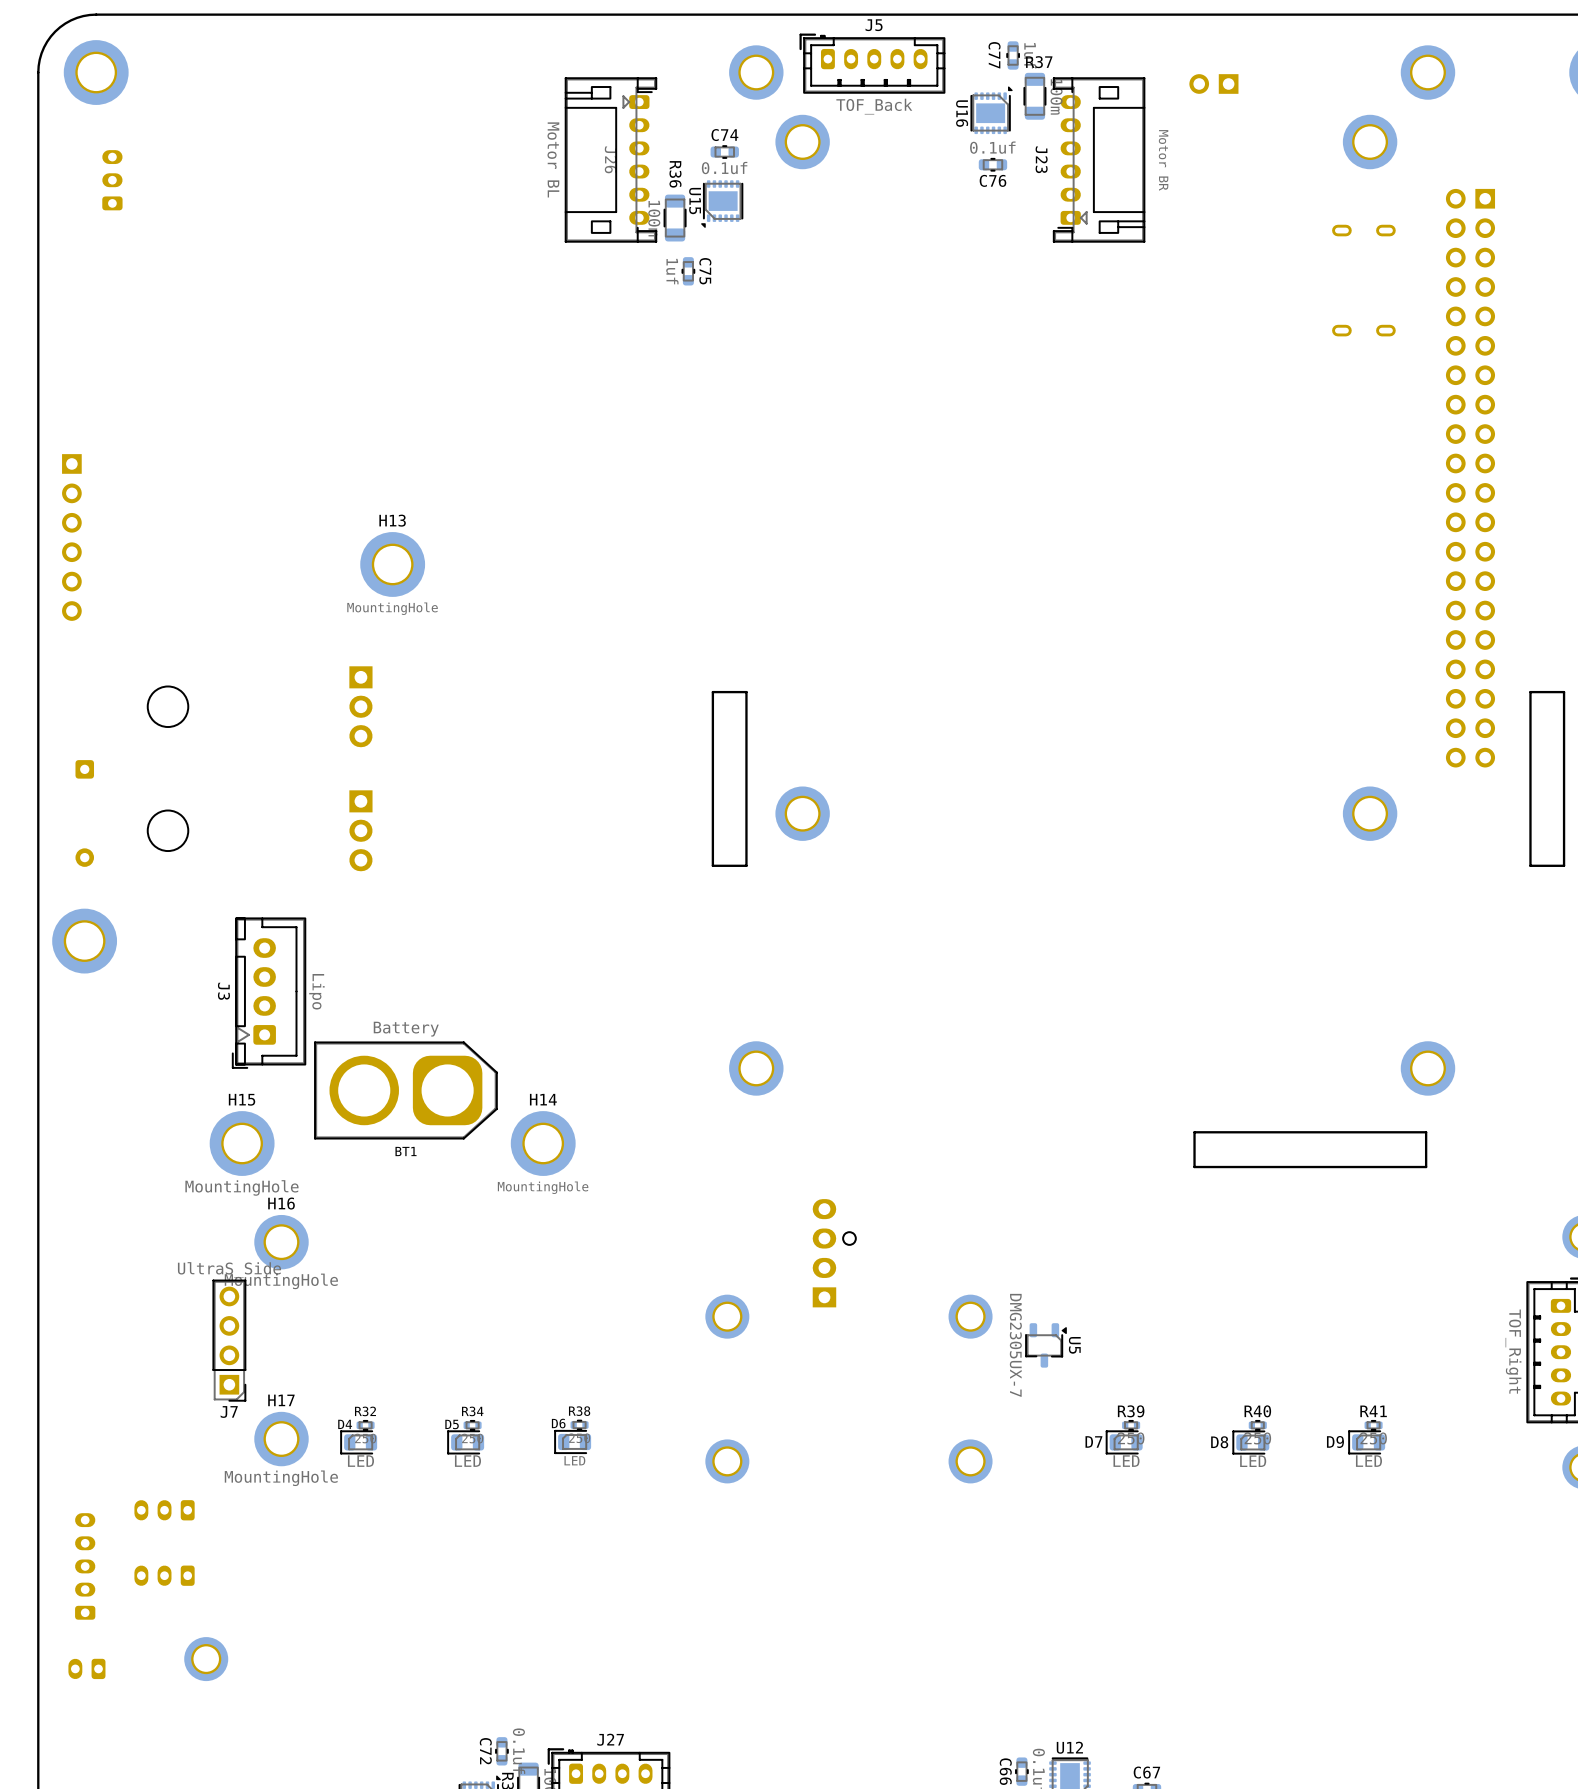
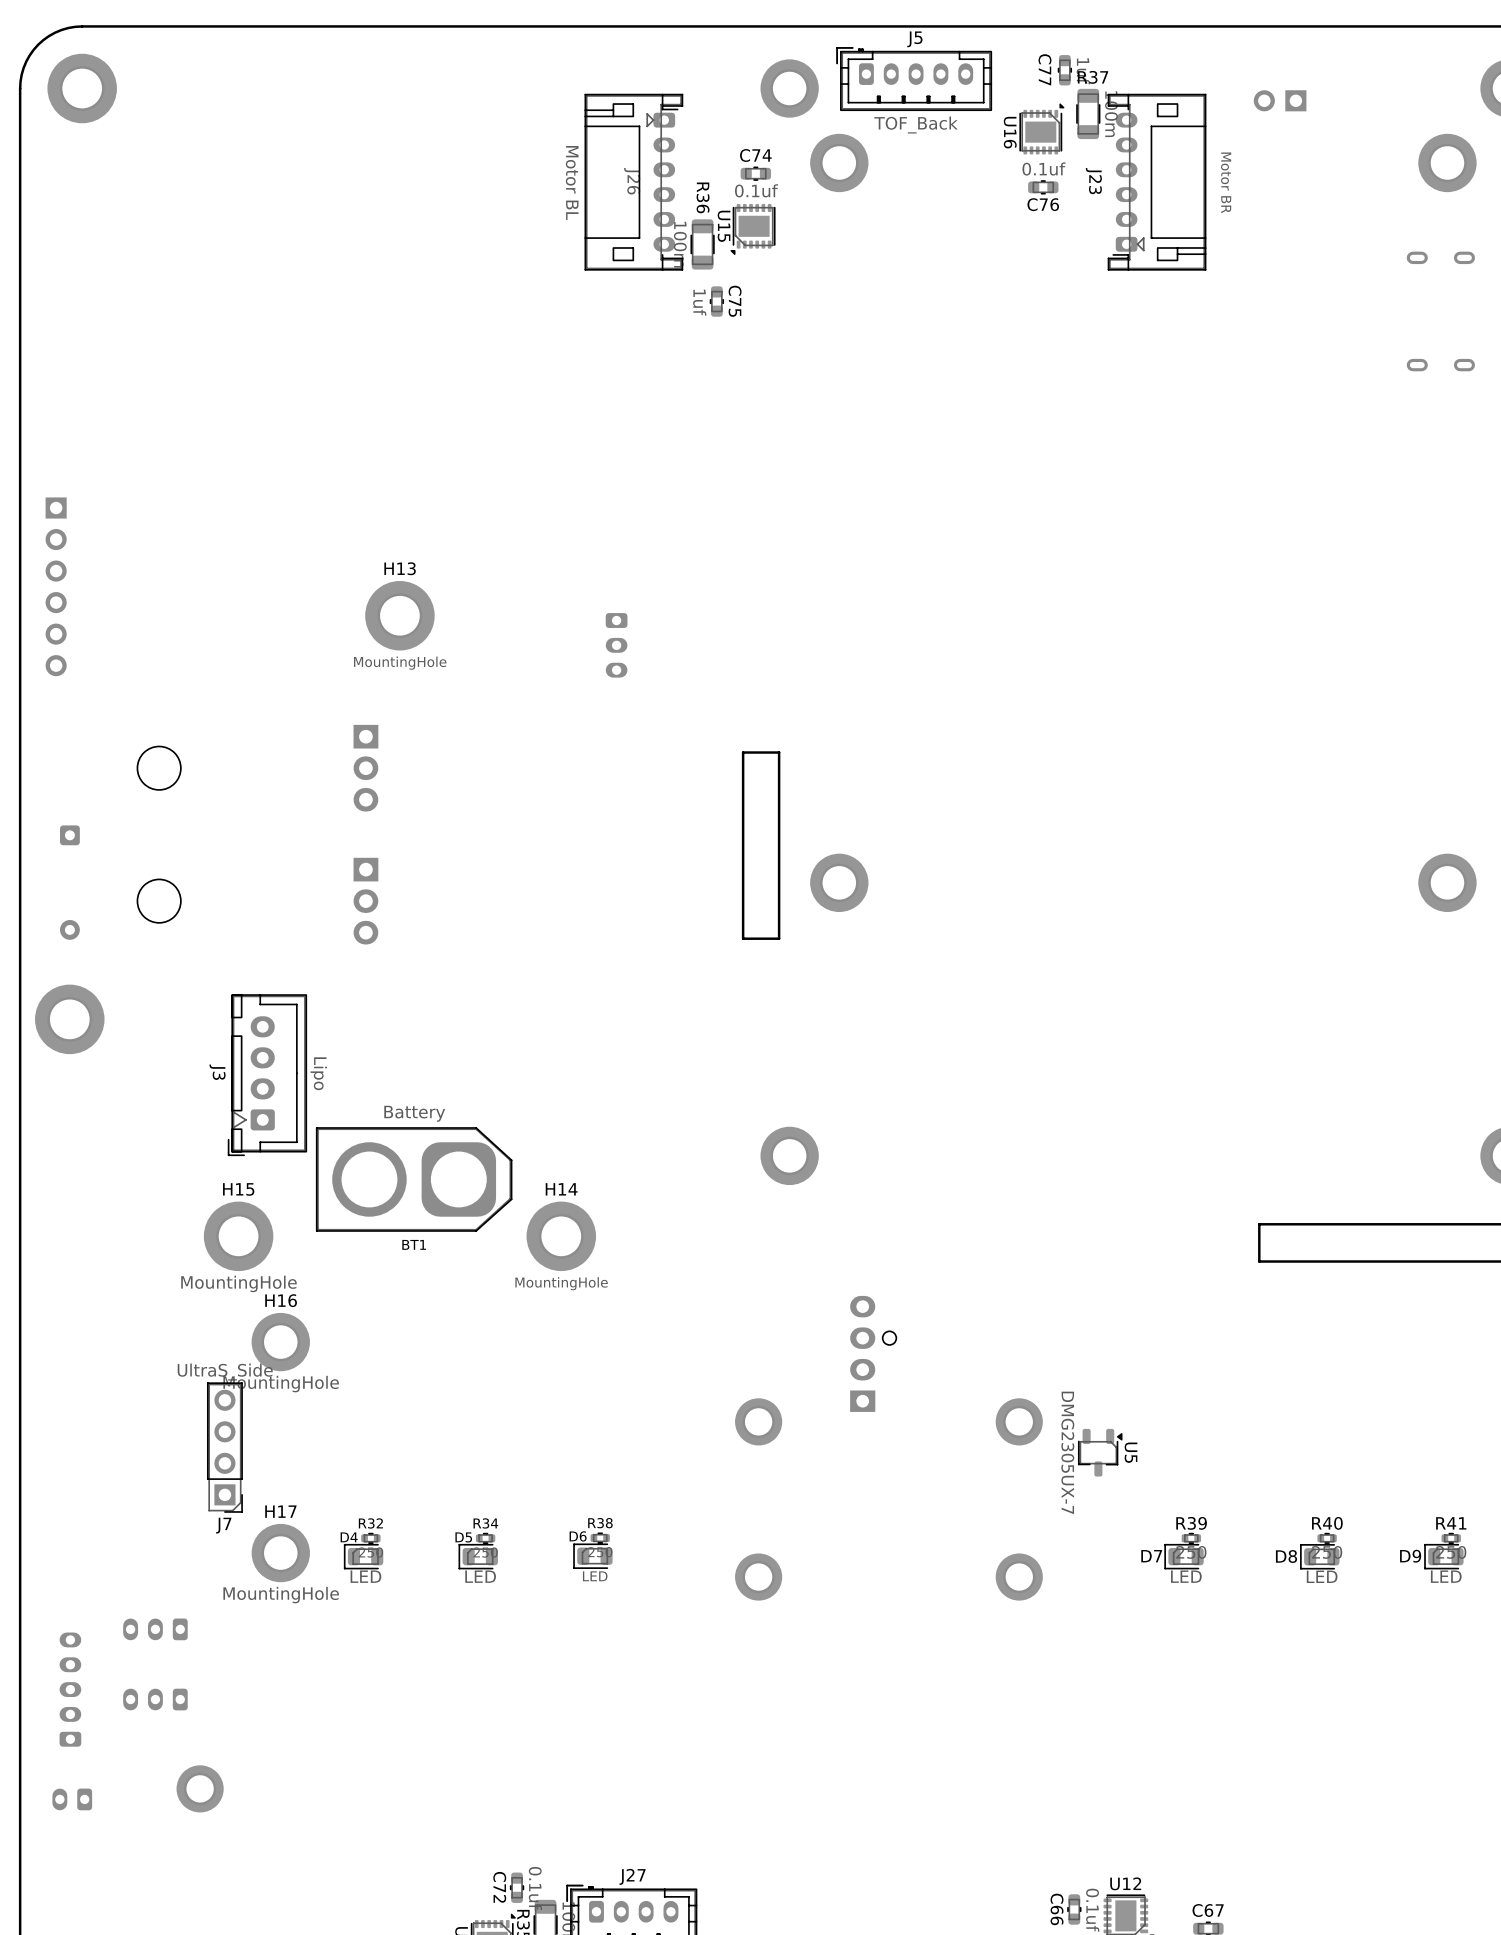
part: (112, 180) -> none
part: none -> (616, 645)

